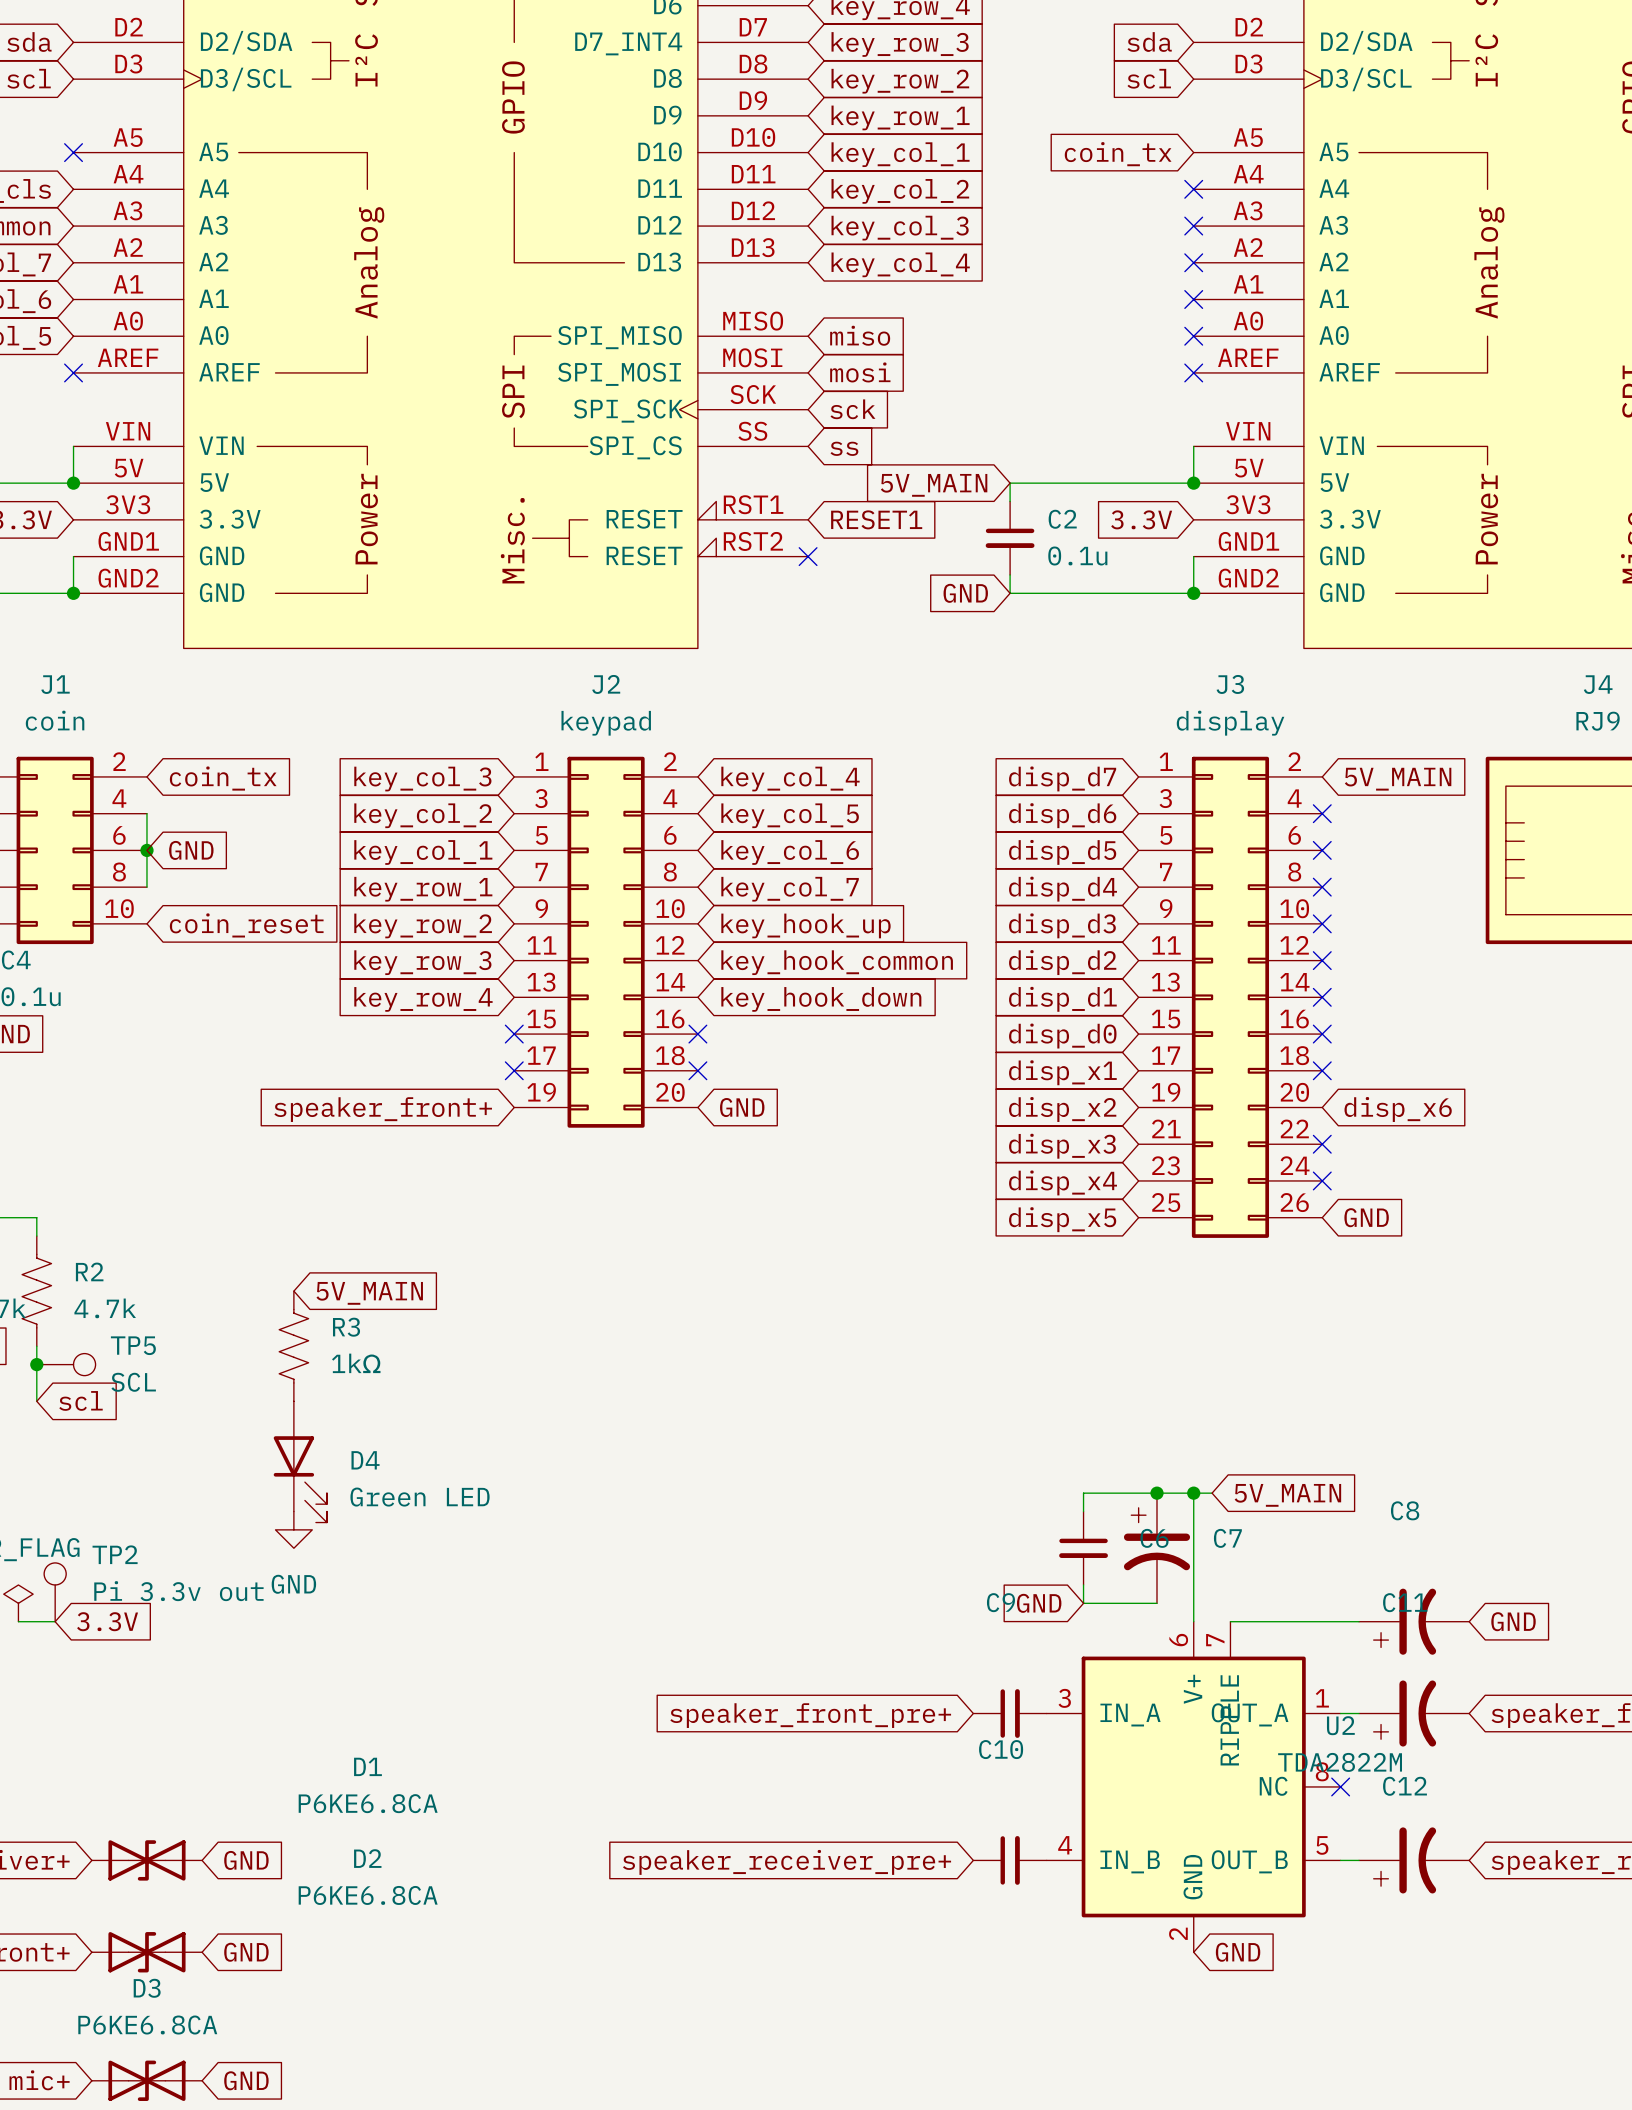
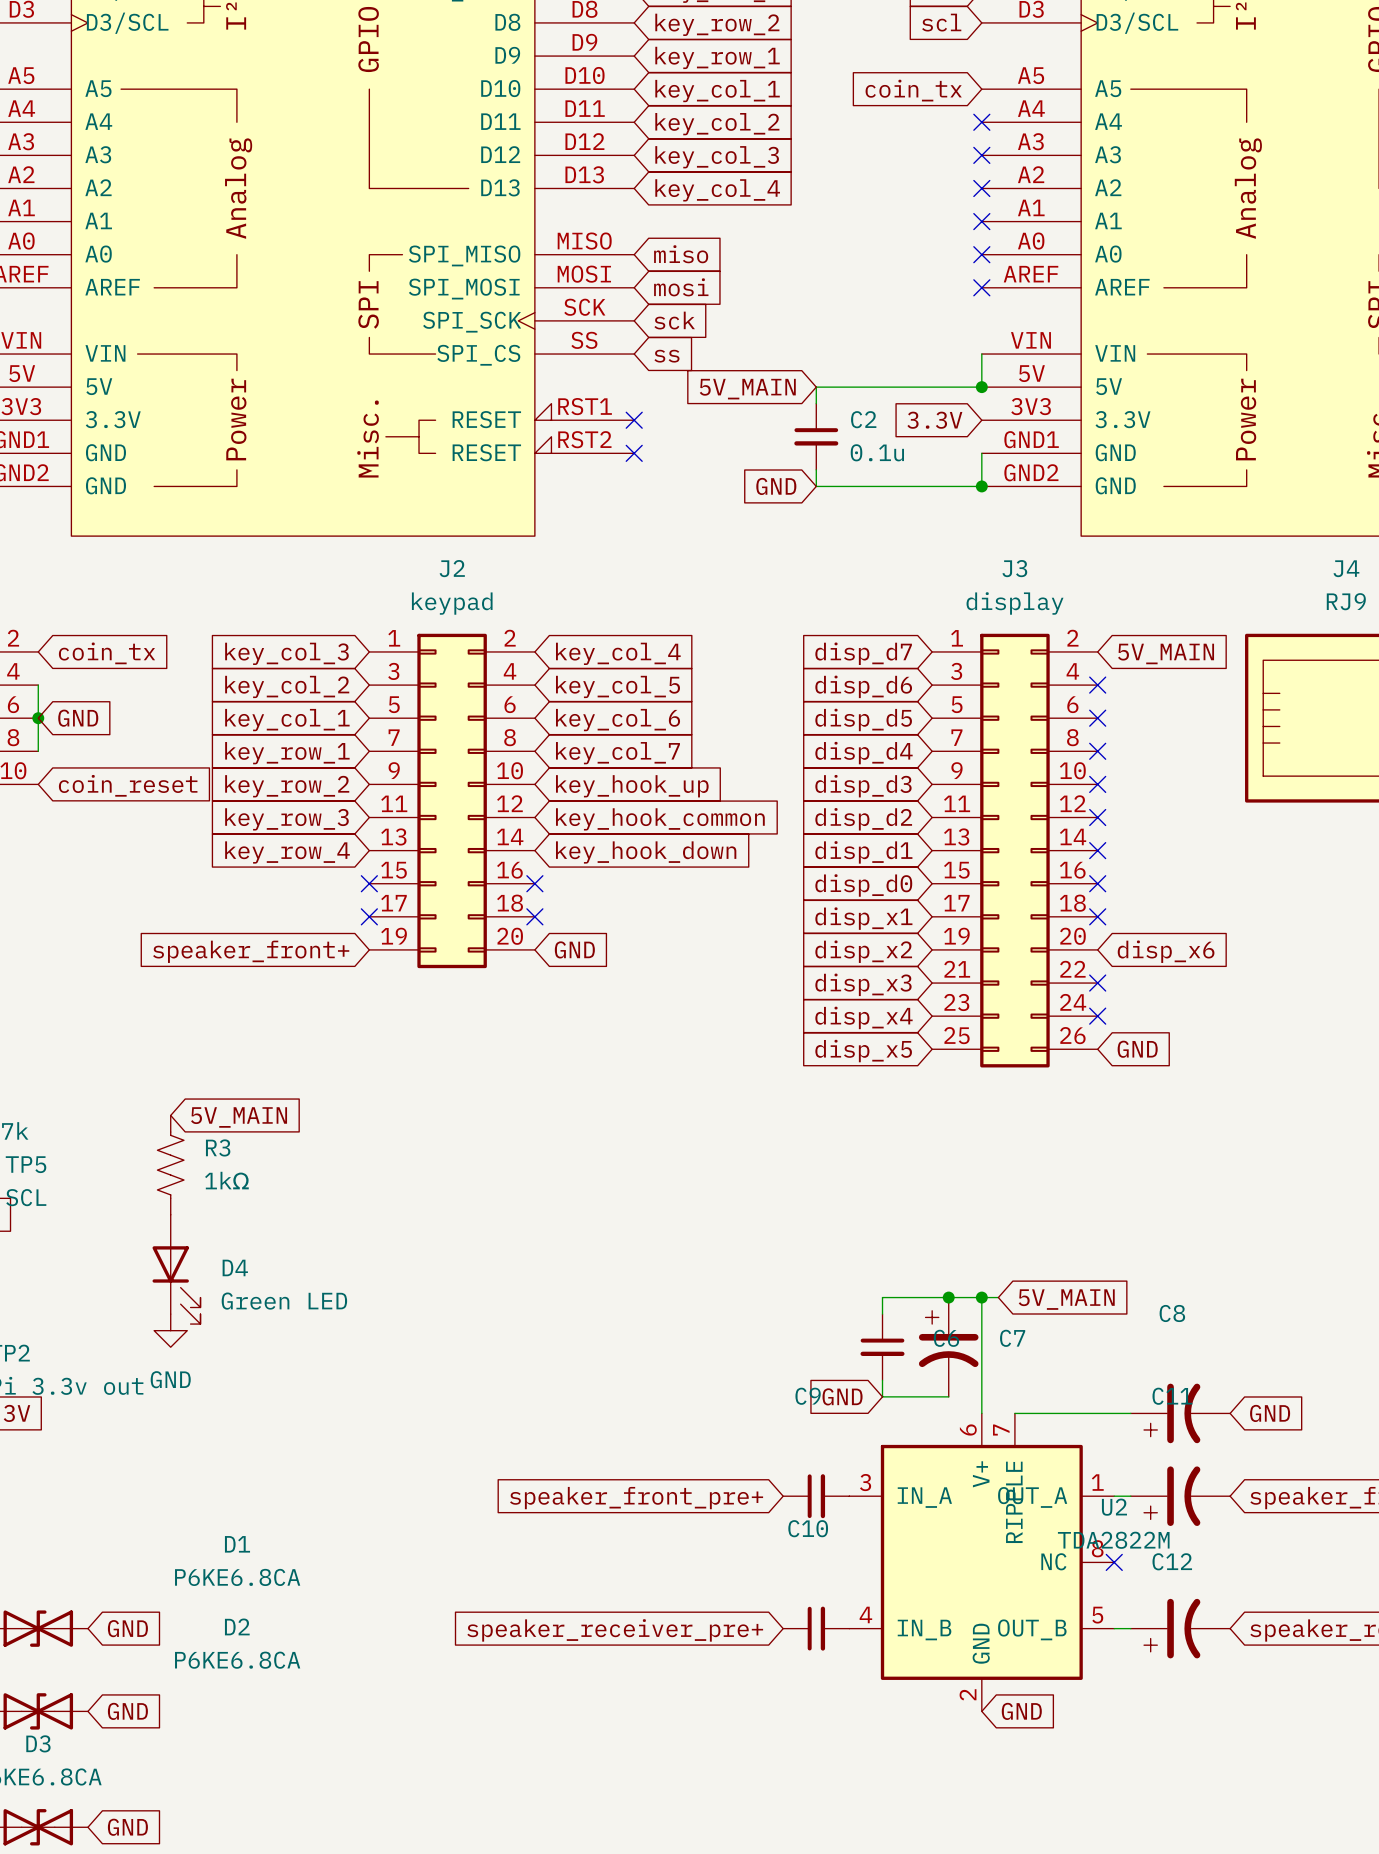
no-connect mark: none -> (634, 420)
global label: RESET1 (876, 519) -> none

